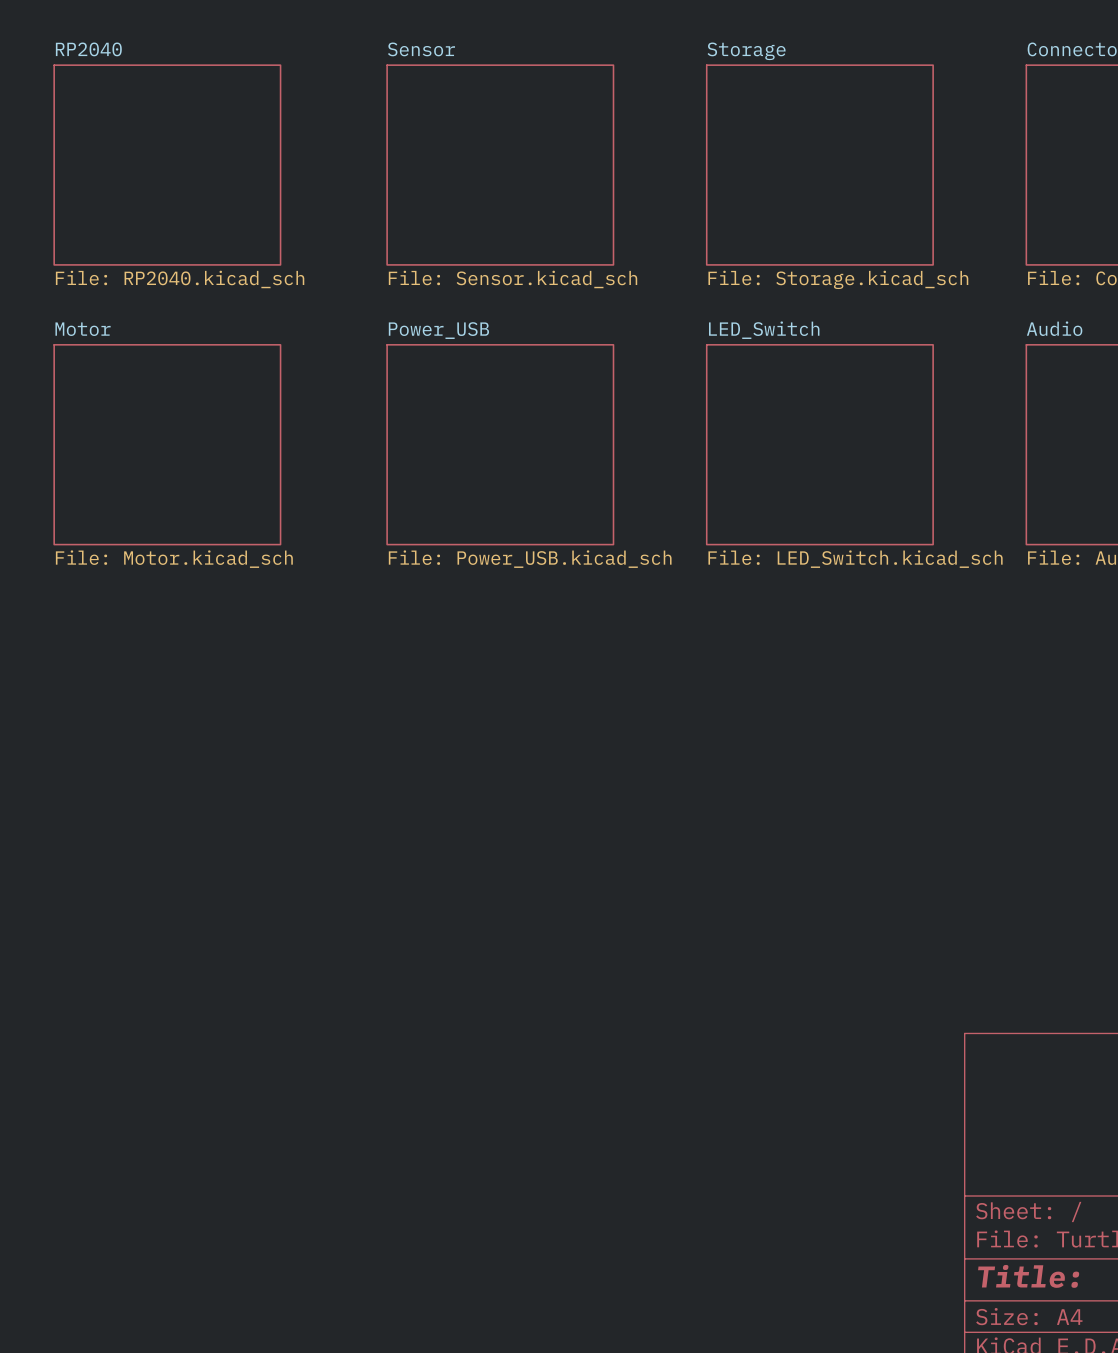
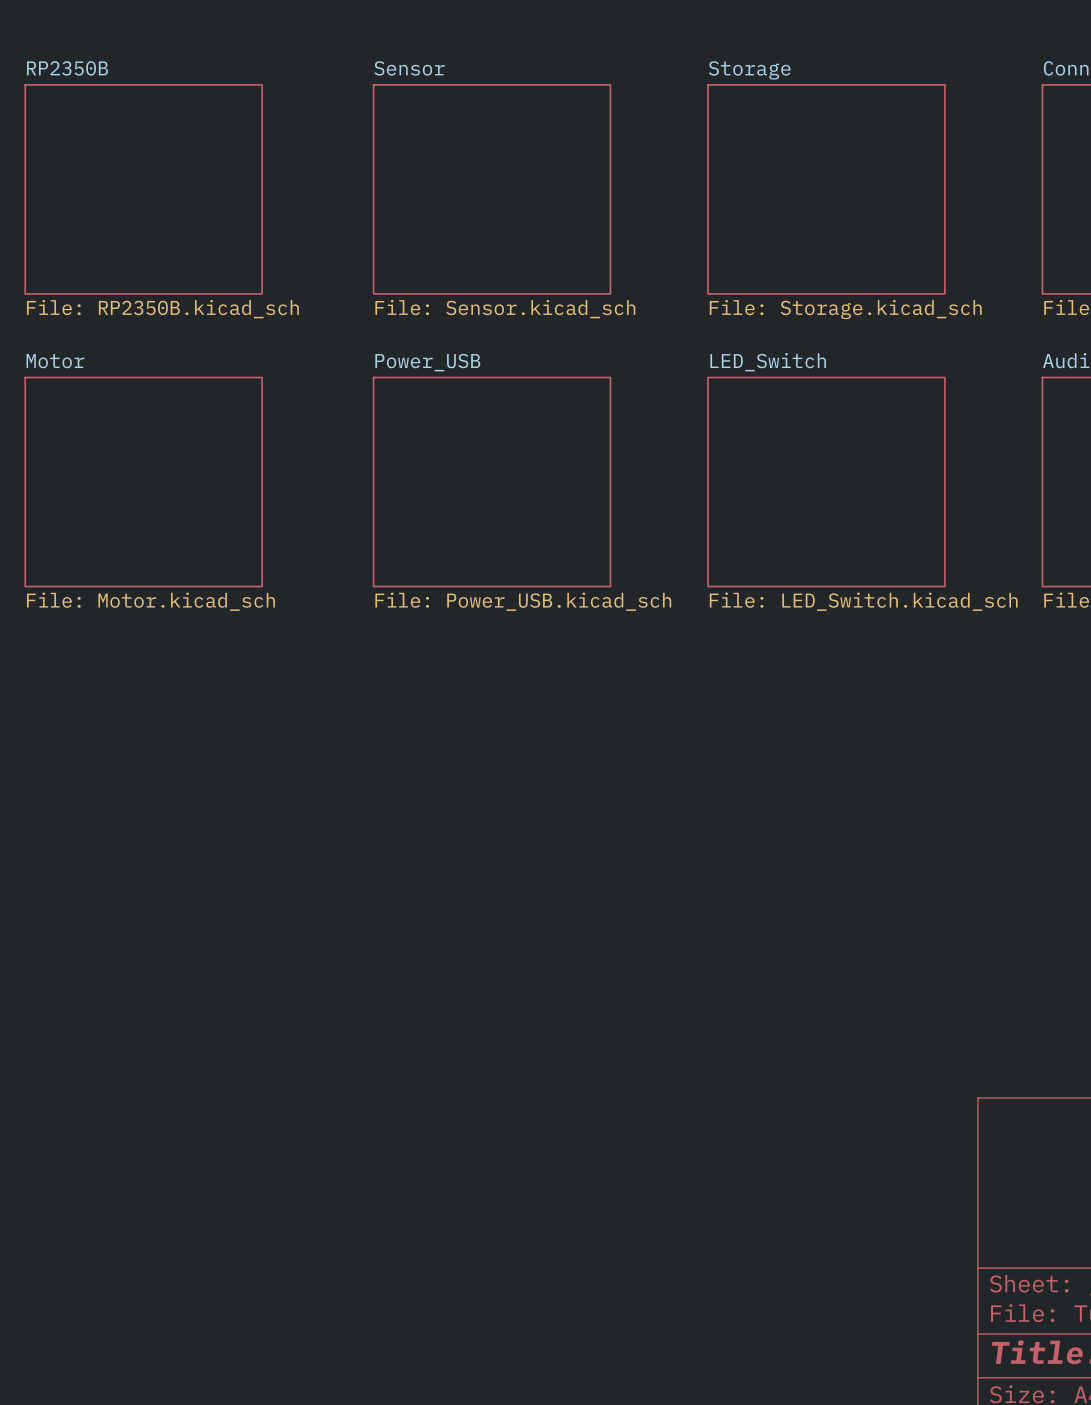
sheet RP2040 name: RP2040 (88, 49) -> RP2350B (67, 68)
sheet RP2040 value: File: RP2040.kicad_sch (180, 279) -> File: RP2350B.kicad_sch (162, 309)

